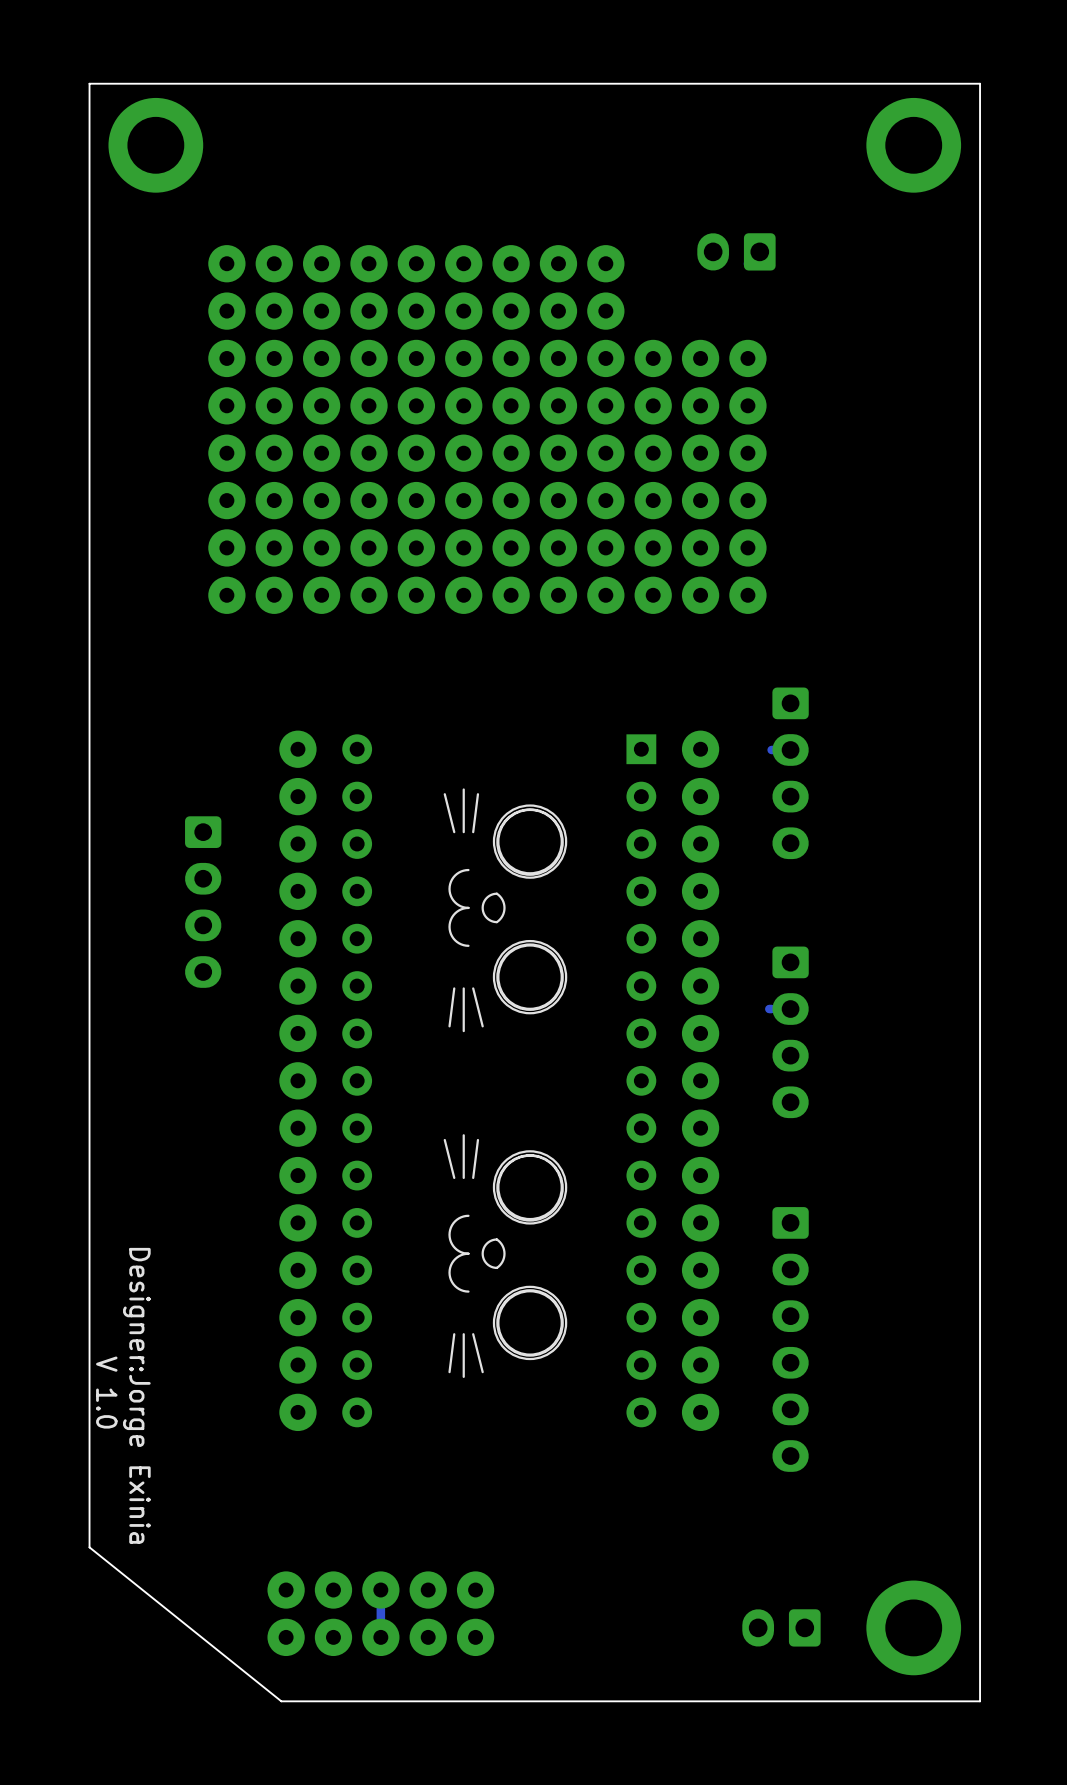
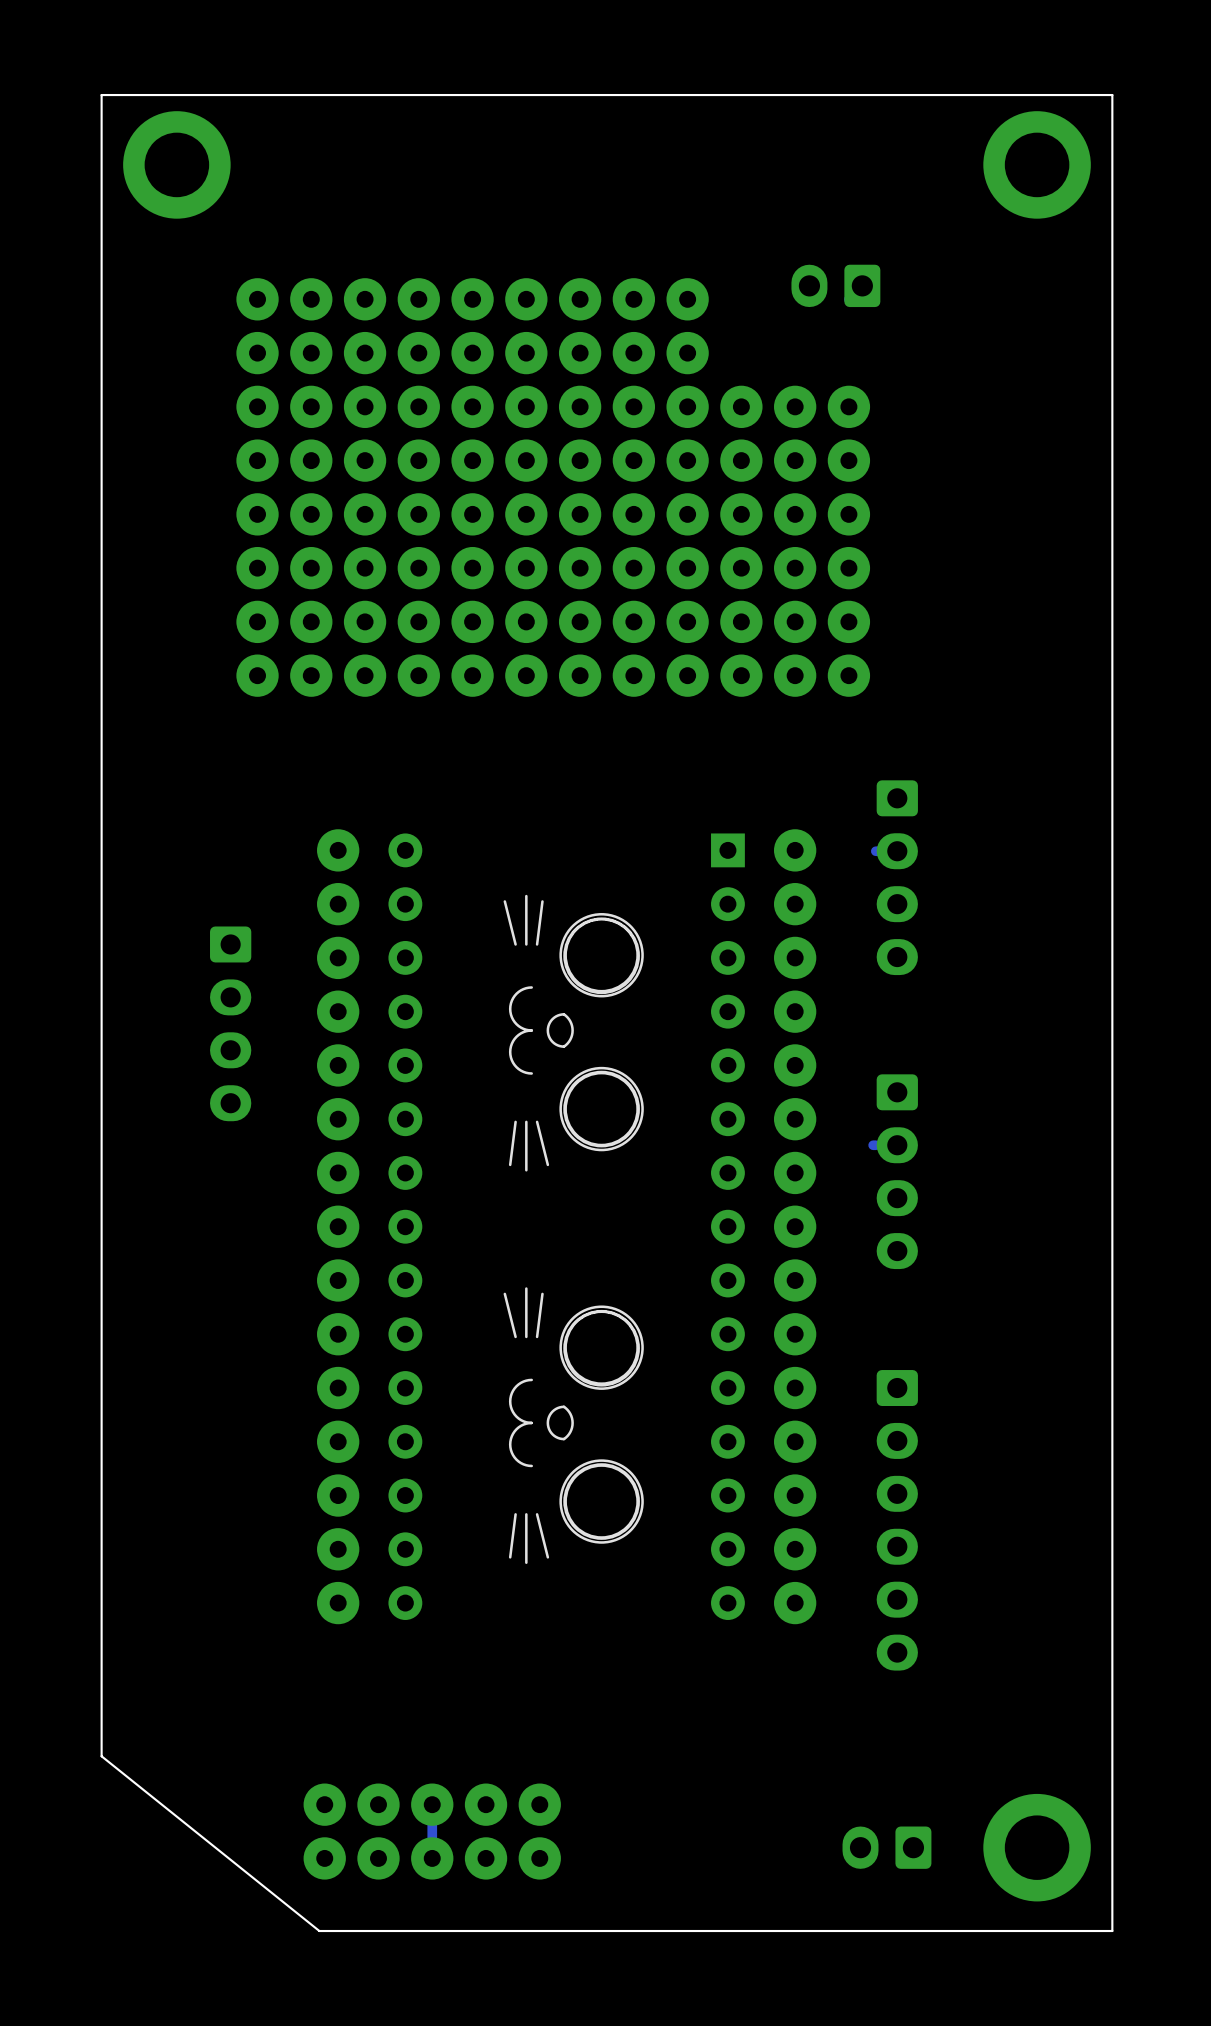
text: V 1.0 (106, 1392) -> none
text: Designer:Jorge Exinia (136, 1395) -> none

